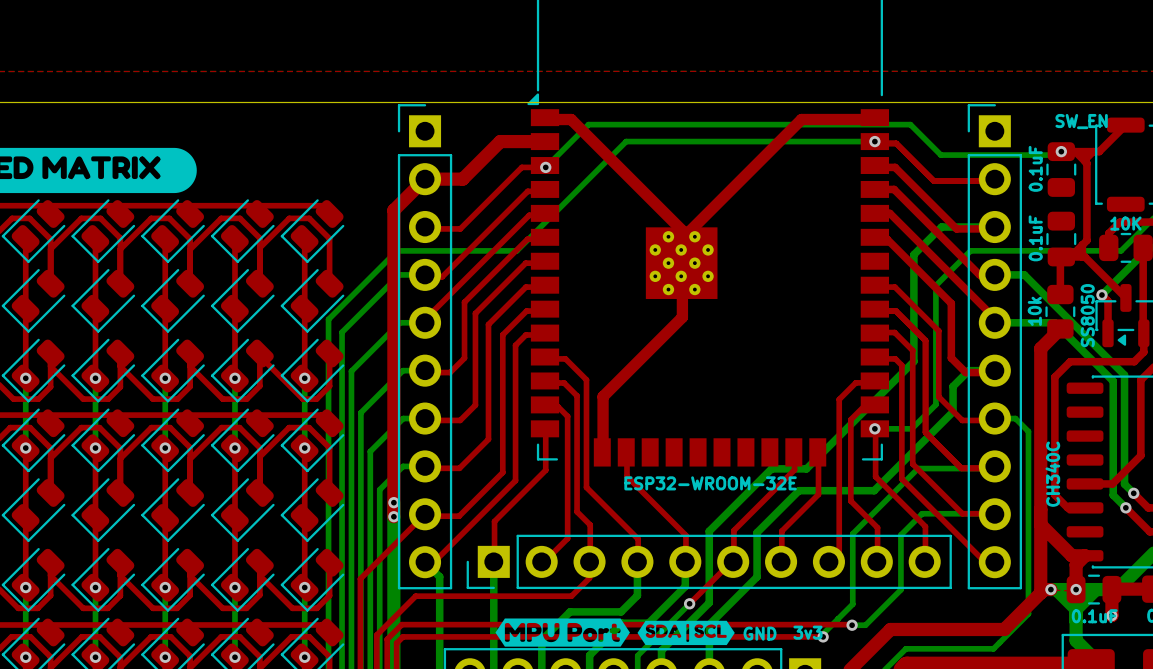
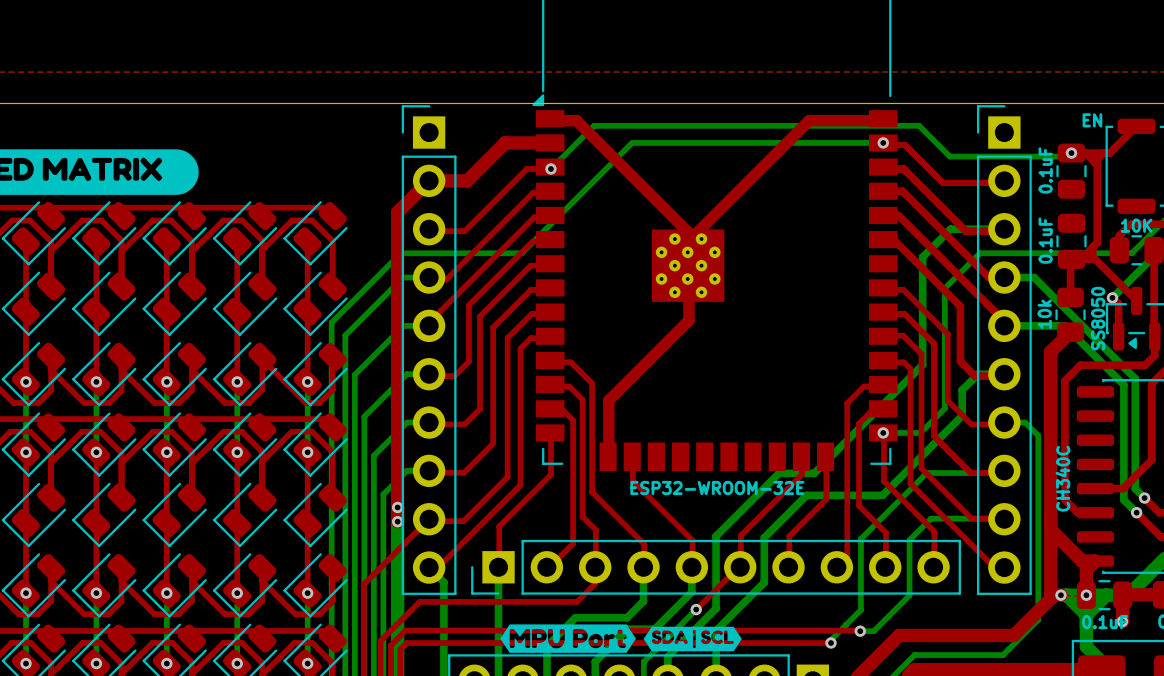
part value: SW_EN (1081, 121) -> EN (1092, 120)
text: 3v3 (807, 632) -> none
text: GND (760, 633) -> none

